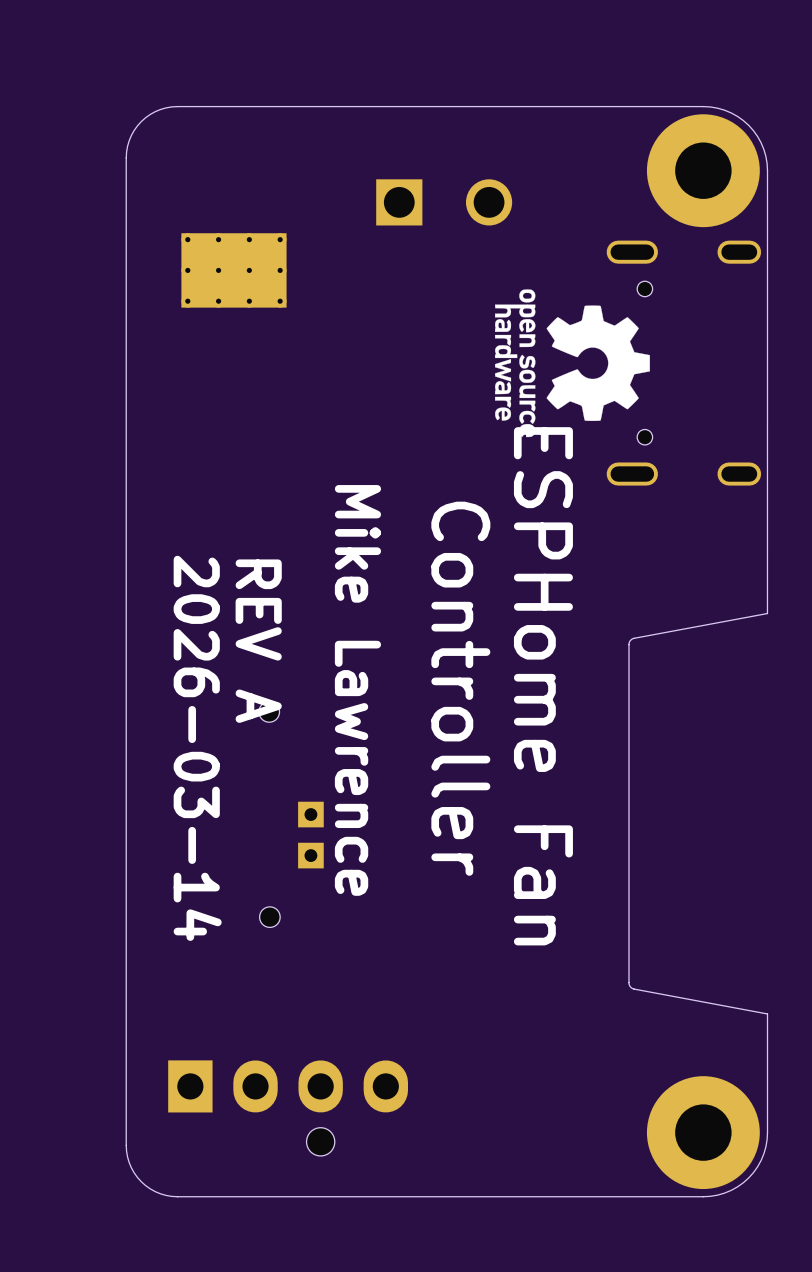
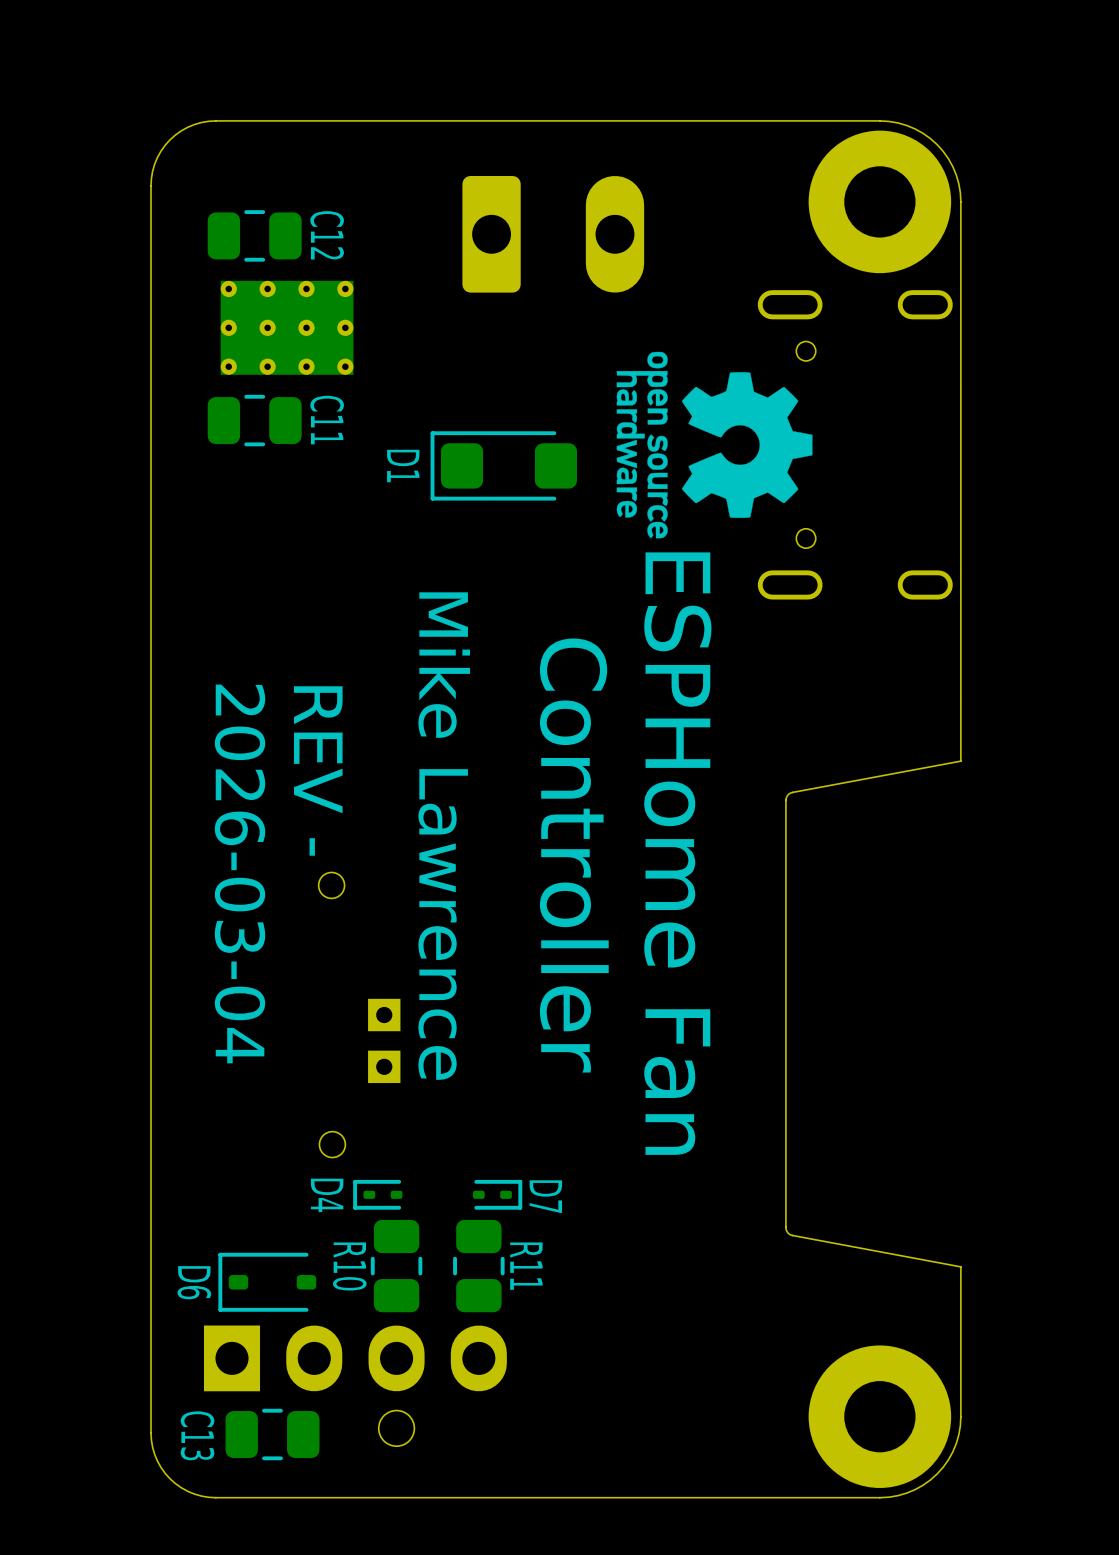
part footprint: [376, 179, 513, 226] -> [462, 175, 645, 293]
C12: none -> (254, 235)
C11: none -> (254, 420)
D1: none -> (503, 465)
text: REV A (258, 641) -> REV - (318, 770)
text: 2026-03-14 (197, 748) -> 2026-03-04 (240, 873)
D4: none -> (377, 1194)
D7: none -> (497, 1194)
R10: none -> (396, 1266)
R11: none -> (478, 1266)
D6: none -> (267, 1282)
C13: none -> (272, 1434)

